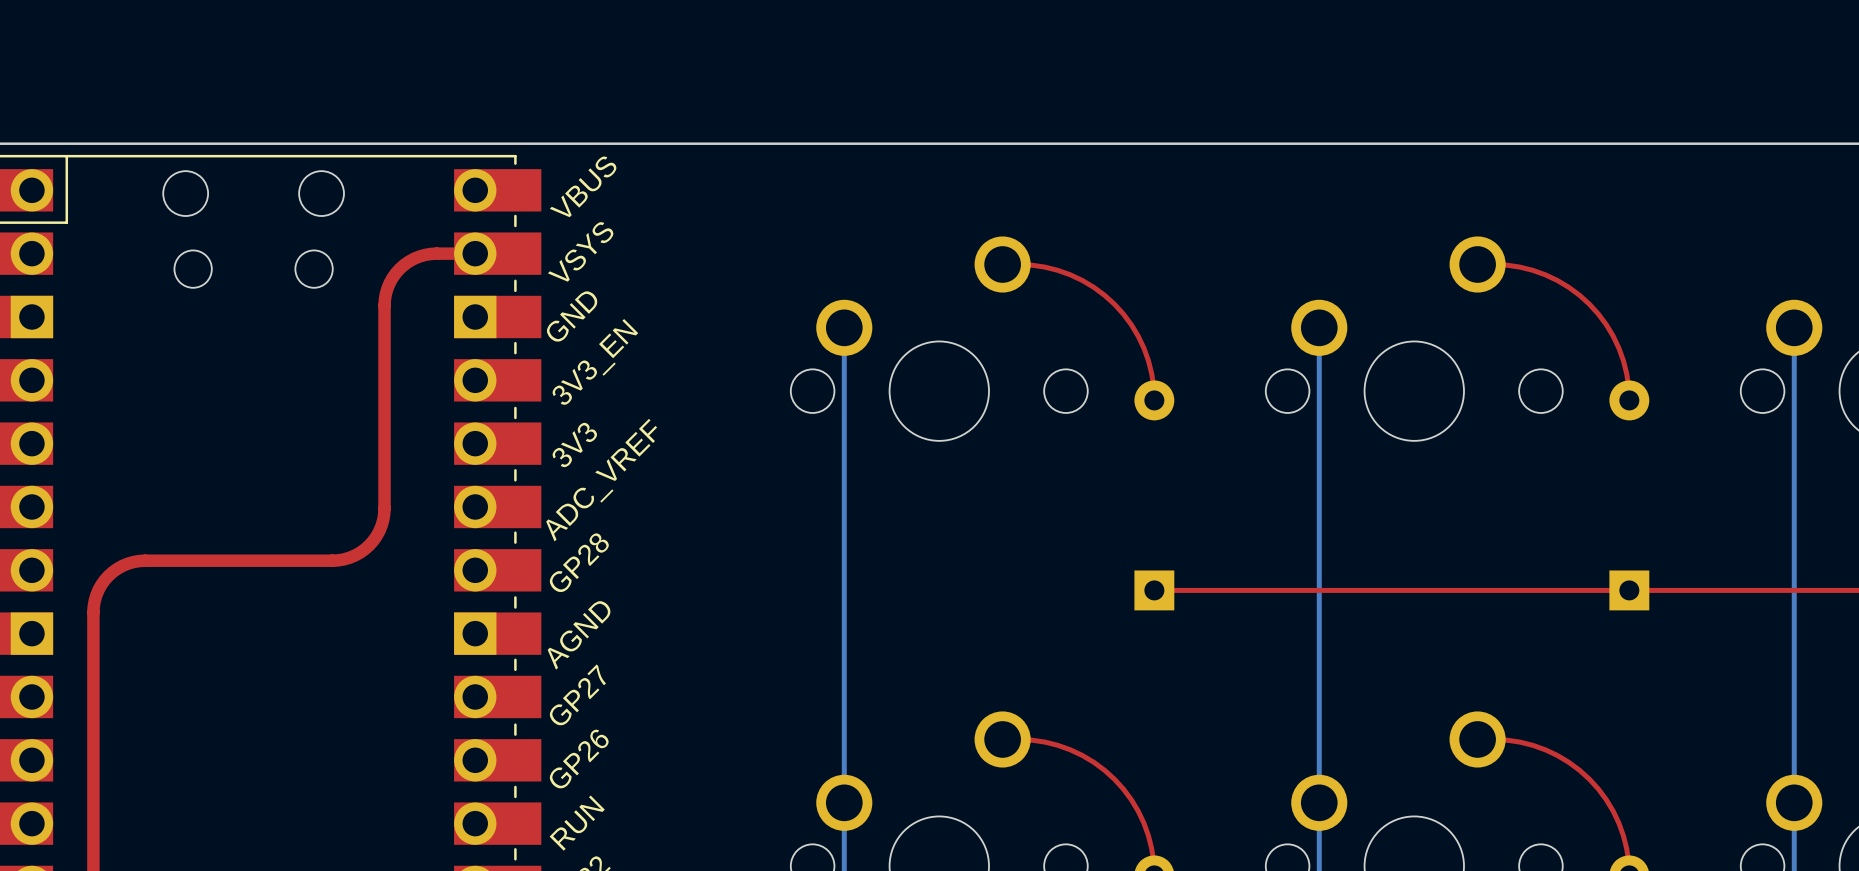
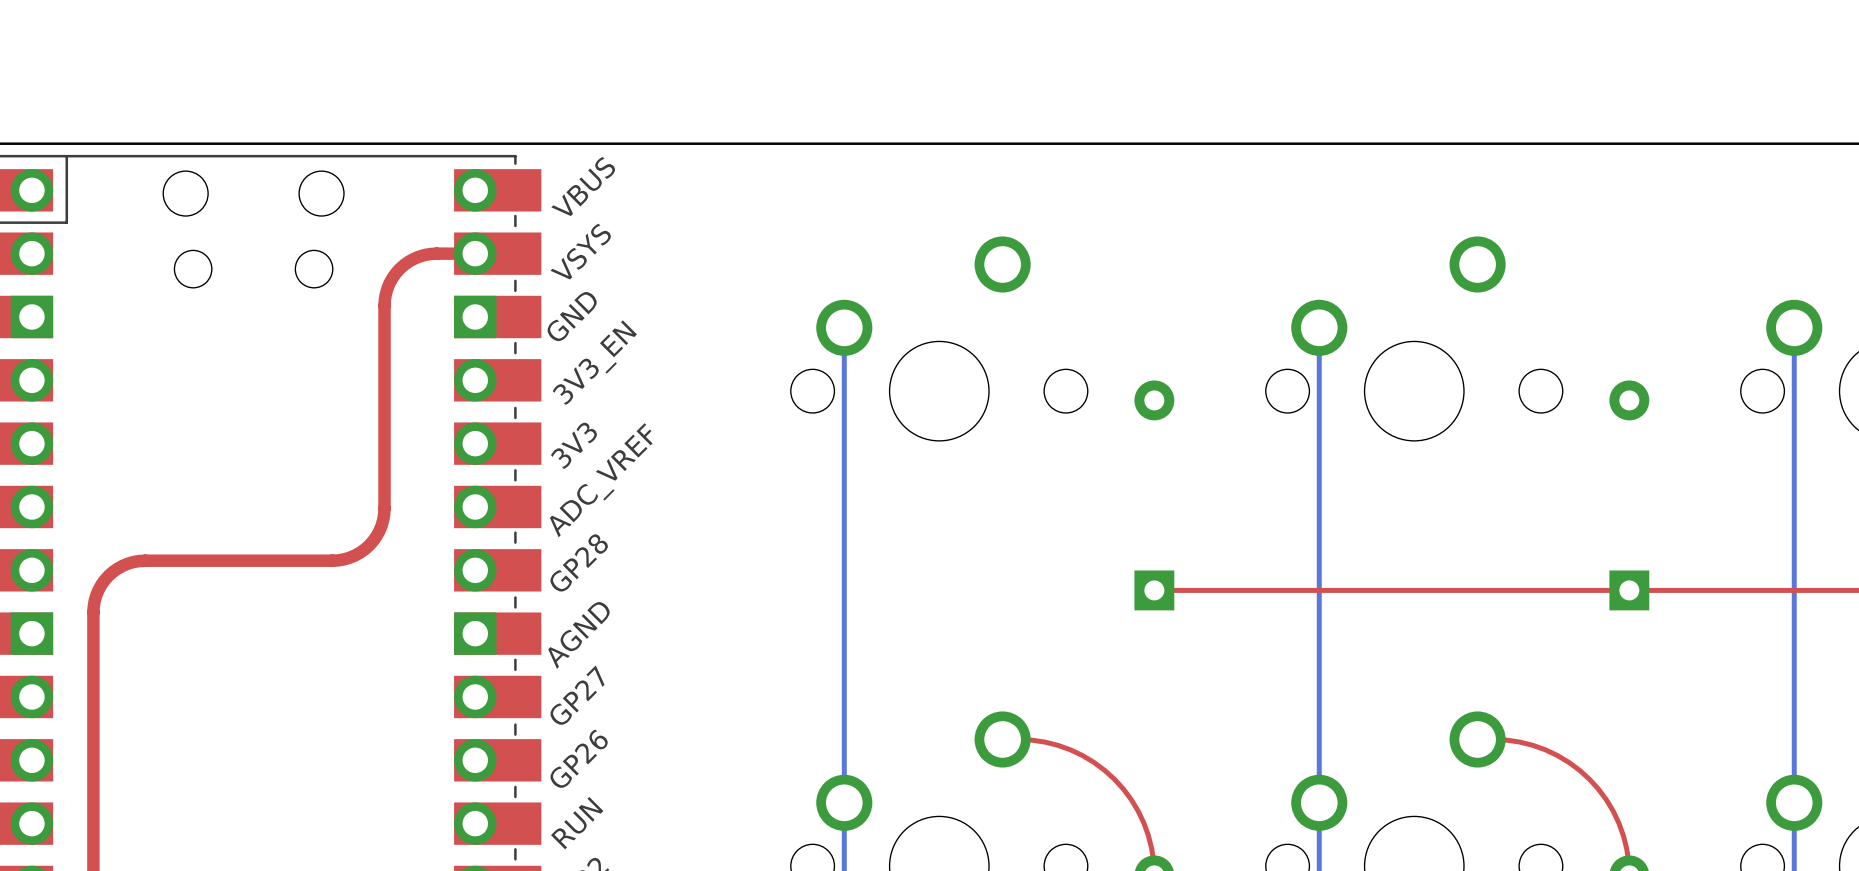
top track: (1002, 264) (1031, 265) (1057, 270) (1082, 280) (1104, 295) (1131, 324) (1144, 348) (1151, 373) (1154, 400) -> none
top track: (1477, 264) (1506, 265) (1532, 270) (1557, 280) (1579, 295) (1598, 314) (1613, 336) (1623, 360) (1629, 400) -> none

